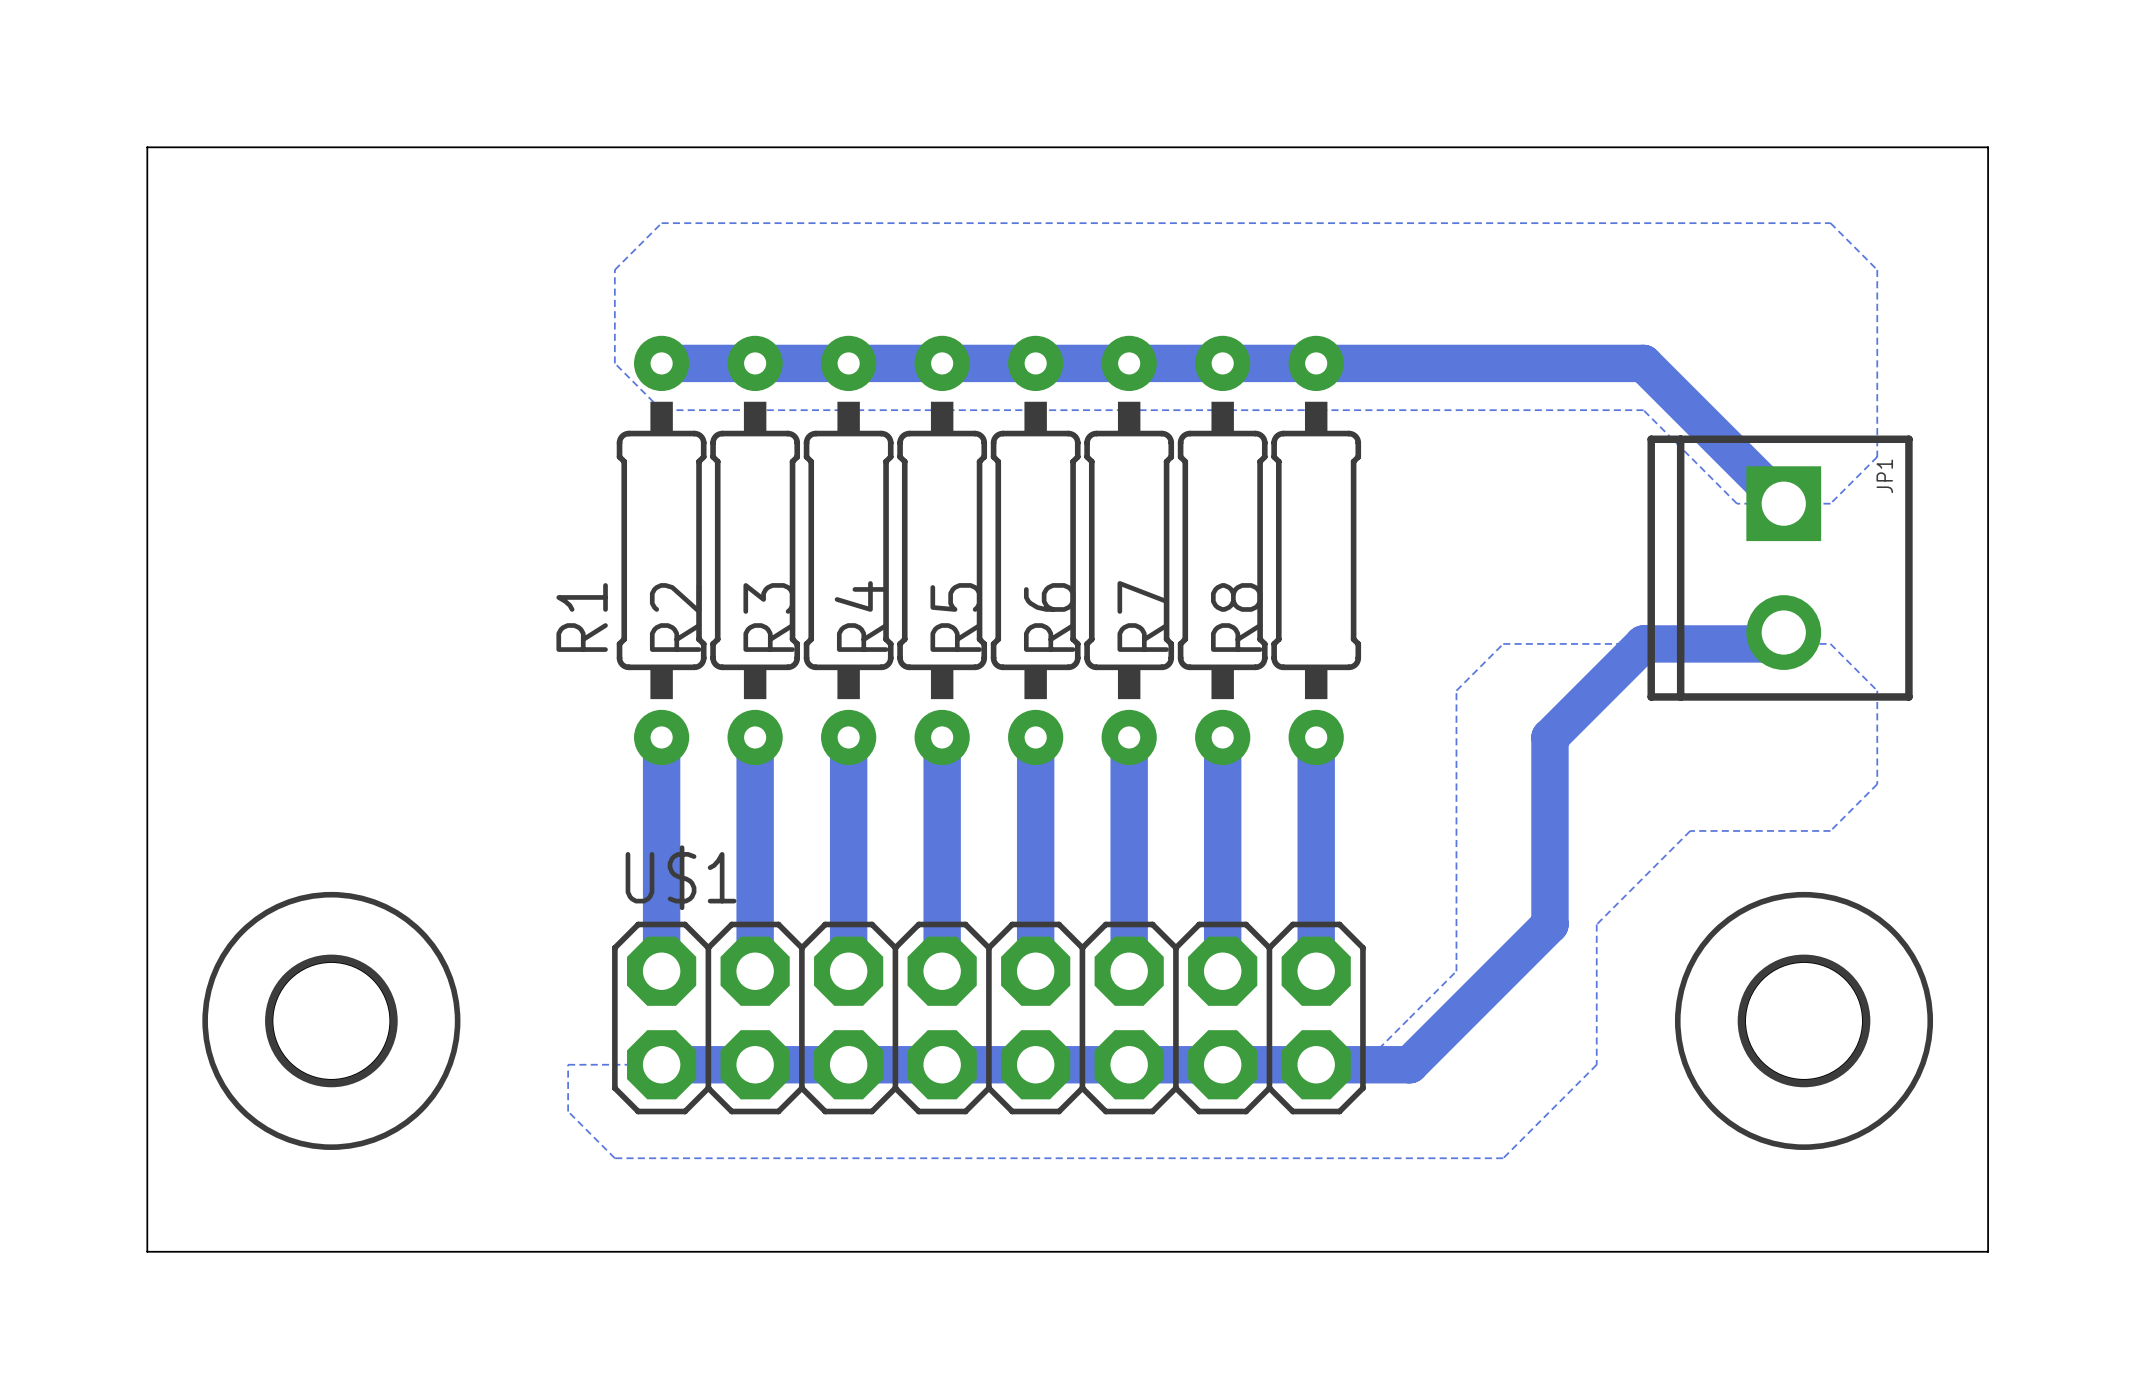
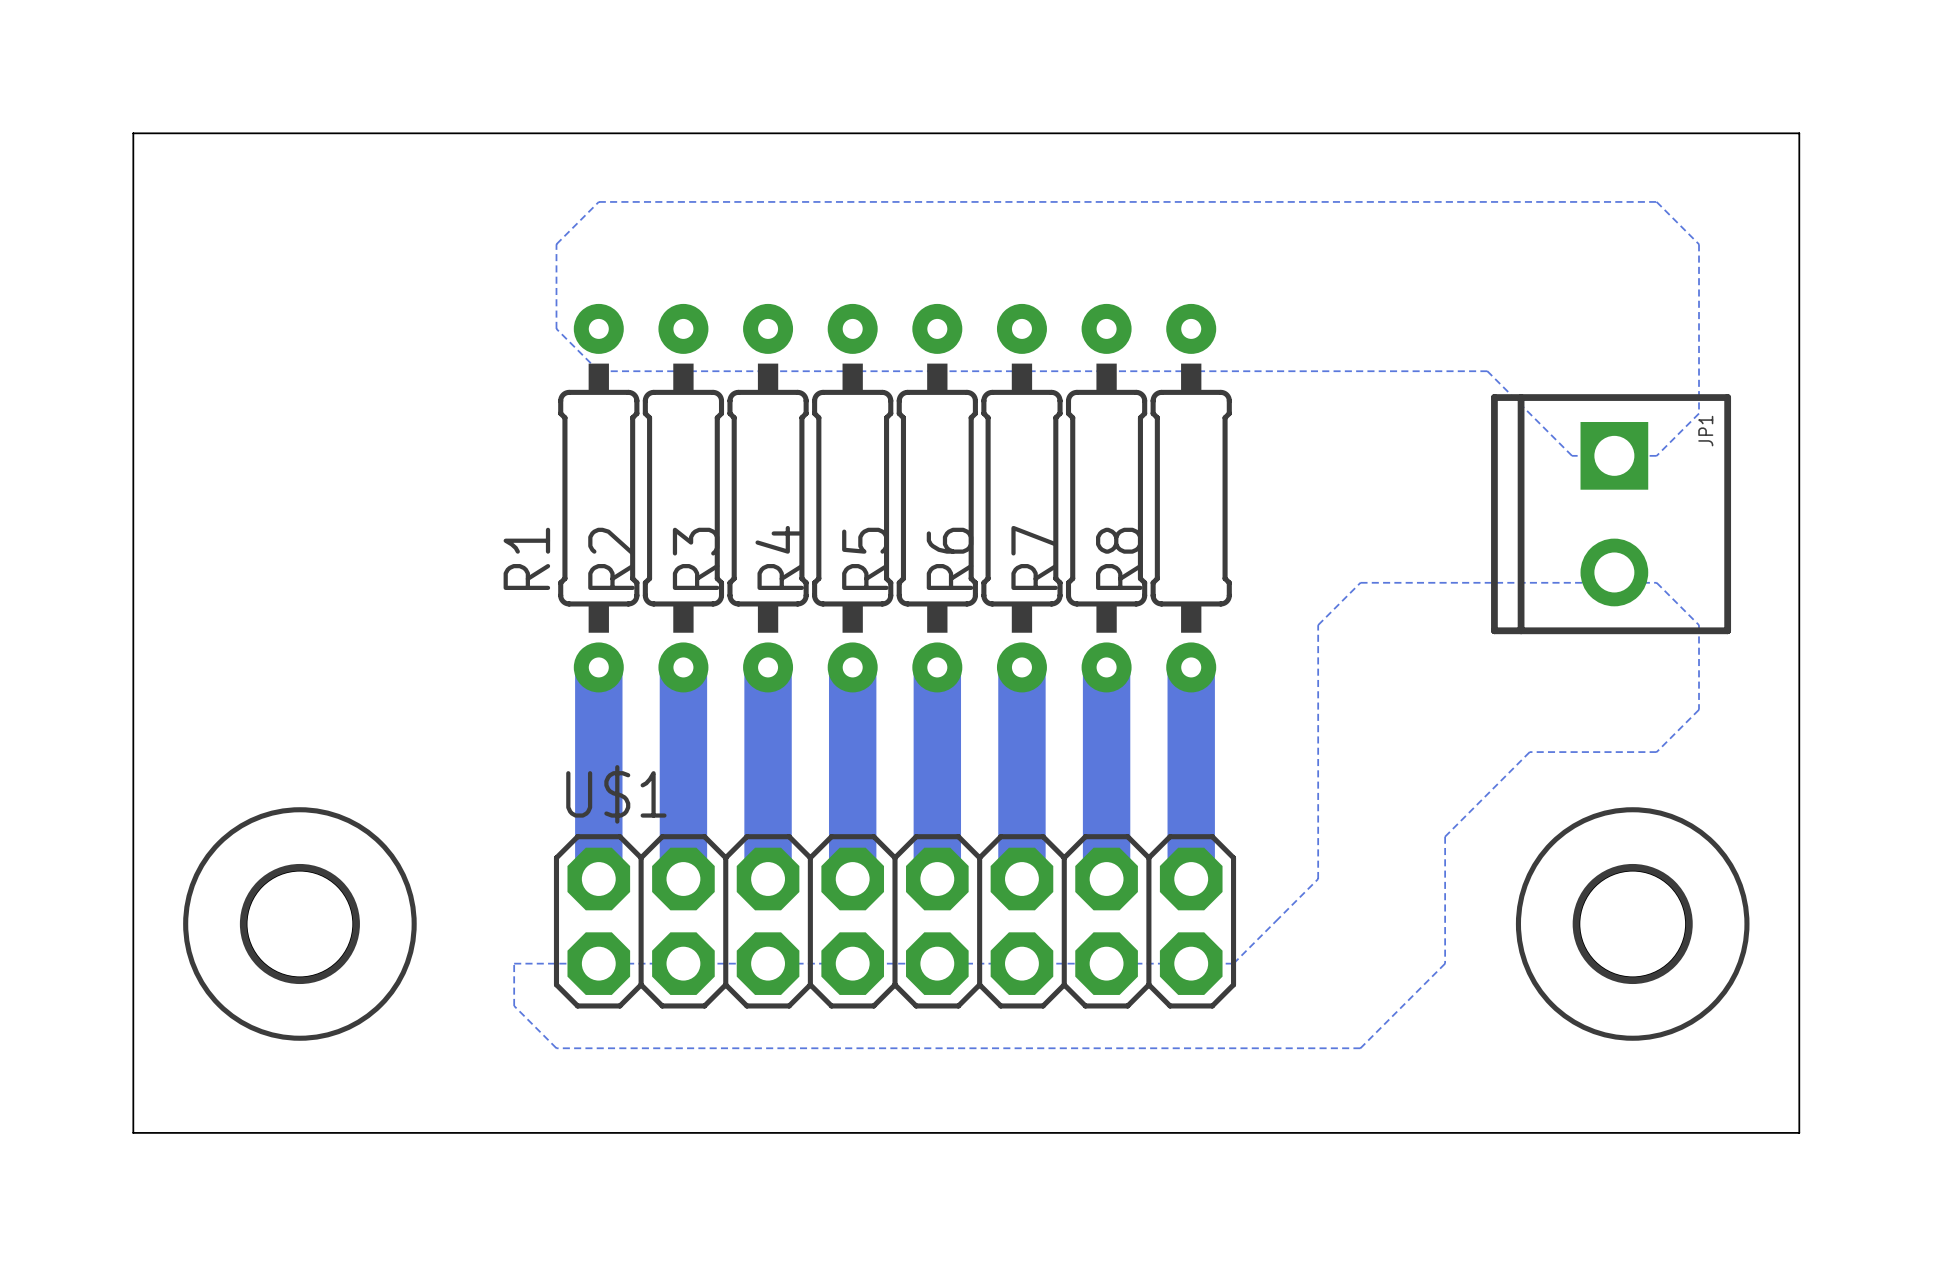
bottom track: (661, 363) (1643, 363) (1783, 503) -> none
bottom track: (1783, 632) (1772, 643) (1643, 643) (1549, 737) (1549, 924) (1409, 1064) (661, 1064) -> none
bottom track width: thin (661, 737) (661, 971) -> thick (598, 667) (598, 879)
bottom track width: thin (755, 737) (755, 971) -> thick (683, 667) (683, 879)
bottom track width: thin (848, 737) (848, 971) -> thick (768, 667) (768, 879)
bottom track width: thin (942, 737) (942, 971) -> thick (852, 667) (852, 879)
bottom track width: thin (1035, 737) (1035, 971) -> thick (937, 667) (937, 879)
bottom track width: thin (1129, 737) (1129, 971) -> thick (1021, 667) (1021, 879)
bottom track width: thin (1222, 737) (1222, 971) -> thick (1106, 667) (1106, 879)
bottom track width: thin (1316, 737) (1316, 971) -> thick (1191, 667) (1191, 879)

